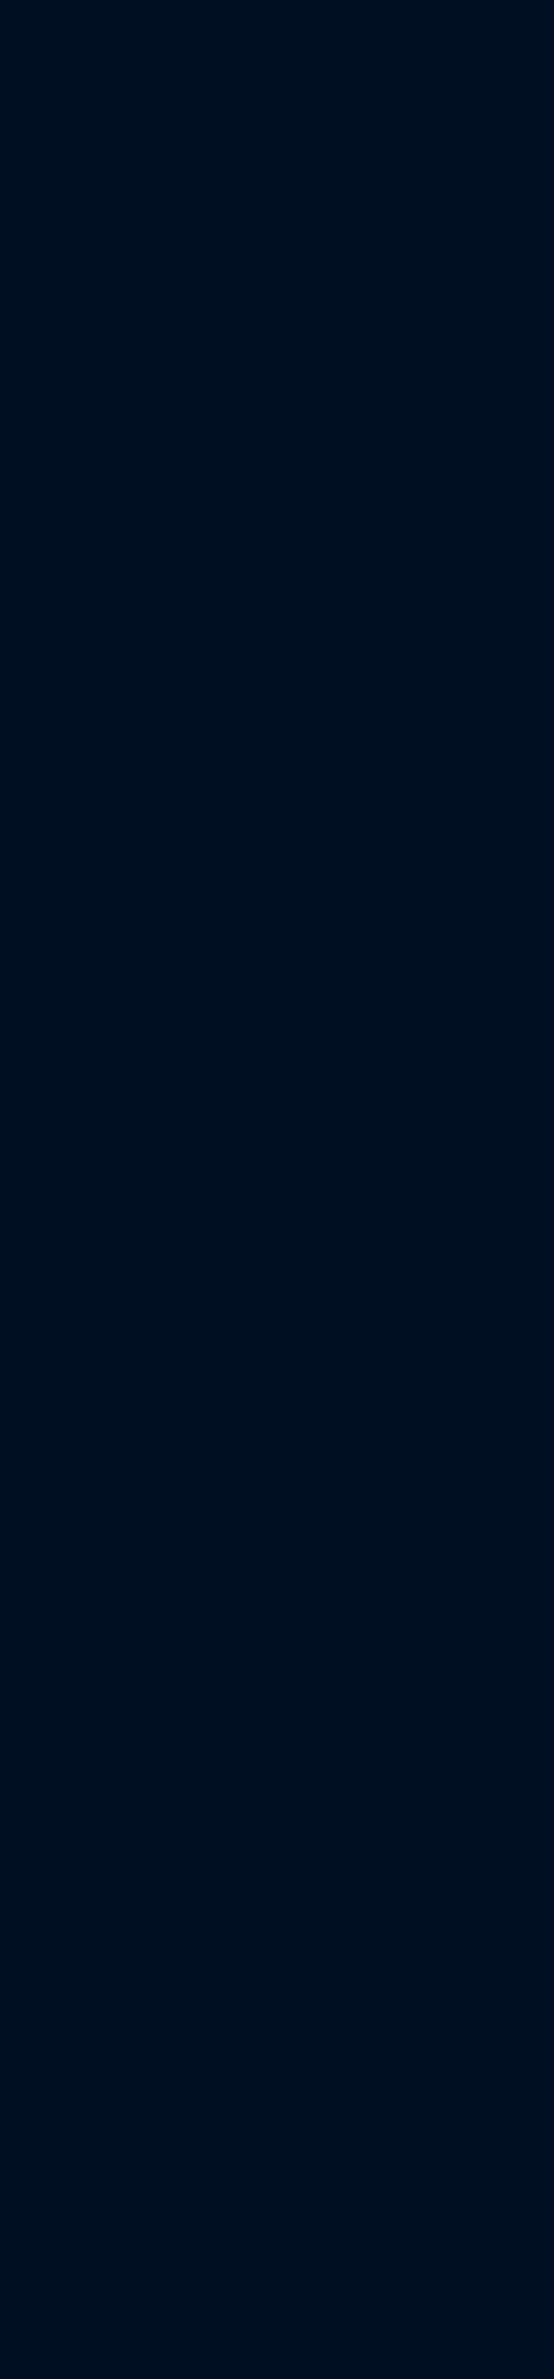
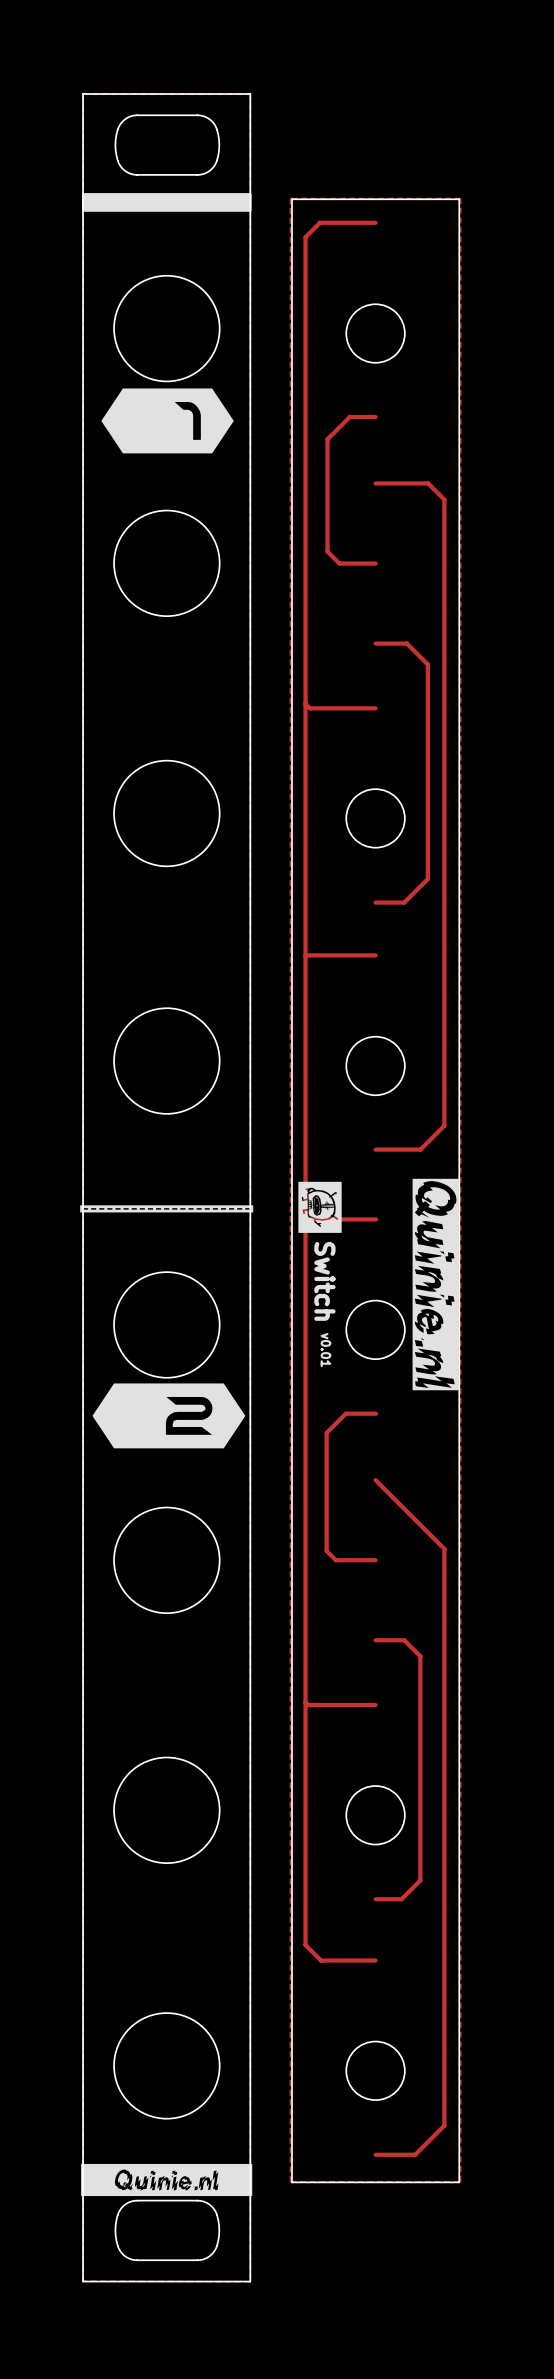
board edge: none -> (83, 93) (250, 93) (250, 2281) (83, 2281) (83, 93)
board edge: none -> (137, 115) (197, 115) (209, 119) (216, 127) (219, 139) (218, 155) (214, 165) (209, 170) (200, 174) (137, 174) (125, 170) (119, 165) (116, 155) (116, 134) (123, 120) (129, 116) (134, 115) (137, 115)
drawing: none -> [82, 193, 252, 212]
top zone outline: none -> (290, 198) (460, 198) (460, 2181) (290, 2181) (290, 198)
board edge: none -> (291, 199) (459, 199) (459, 2182) (291, 2182) (291, 199)
top track: none -> (375, 222) (320, 222) (305, 237) (305, 1945) (321, 1960) (375, 1960)
round board edge: none -> [113, 274, 221, 383]
round board edge: none -> [345, 303, 406, 364]
drawing: none -> [101, 388, 234, 454]
top track: none -> (375, 417) (349, 417) (327, 439) (327, 551) (339, 563) (375, 563)
top track: none -> (375, 483) (428, 483) (444, 499) (444, 1125) (420, 1149) (375, 1149)
round board edge: none -> [113, 509, 221, 618]
top track: none -> (375, 643) (406, 643) (427, 664) (427, 879) (404, 902) (375, 902)
top track: none -> (305, 703) (309, 708) (375, 708)
round board edge: none -> [113, 759, 221, 868]
round board edge: none -> [345, 788, 406, 849]
top track: none -> (375, 955) (305, 955)
round board edge: none -> [113, 1007, 221, 1115]
round board edge: none -> [345, 1035, 406, 1097]
drawing: none -> [412, 1178, 459, 1391]
drawing: none -> [298, 1181, 342, 1233]
drawing: none -> [80, 1205, 254, 1213]
top track: none -> (305, 1217) (307, 1219) (376, 1219)
round board edge: none -> [113, 1271, 221, 1379]
text: none -> Switch (324, 1281)
round board edge: none -> [345, 1299, 406, 1361]
text: none -> v0.01 (325, 1350)
drawing: none -> [92, 1383, 246, 1449]
top track: none -> (376, 1413) (345, 1413) (326, 1432) (326, 1550) (335, 1560) (375, 1560)
top track: none -> (375, 1480) (444, 1548) (444, 2125) (415, 2154) (375, 2154)
round board edge: none -> [113, 1506, 221, 1615]
top track: none -> (375, 1640) (404, 1640) (420, 1656) (420, 1880) (401, 1899) (375, 1899)
top track: none -> (305, 1702) (308, 1705) (375, 1705)
round board edge: none -> [113, 1756, 221, 1864]
round board edge: none -> [345, 1785, 406, 1846]
round board edge: none -> [113, 2012, 221, 2120]
round board edge: none -> [345, 2040, 406, 2101]
drawing: none -> [81, 2163, 253, 2197]
board edge: none -> (137, 2200) (197, 2200) (209, 2204) (216, 2212) (219, 2225) (218, 2240) (214, 2250) (207, 2257) (200, 2260) (137, 2260) (125, 2256) (119, 2250) (116, 2240) (116, 2220) (123, 2206) (129, 2202) (132, 2201) (134, 2200) (137, 2200)

